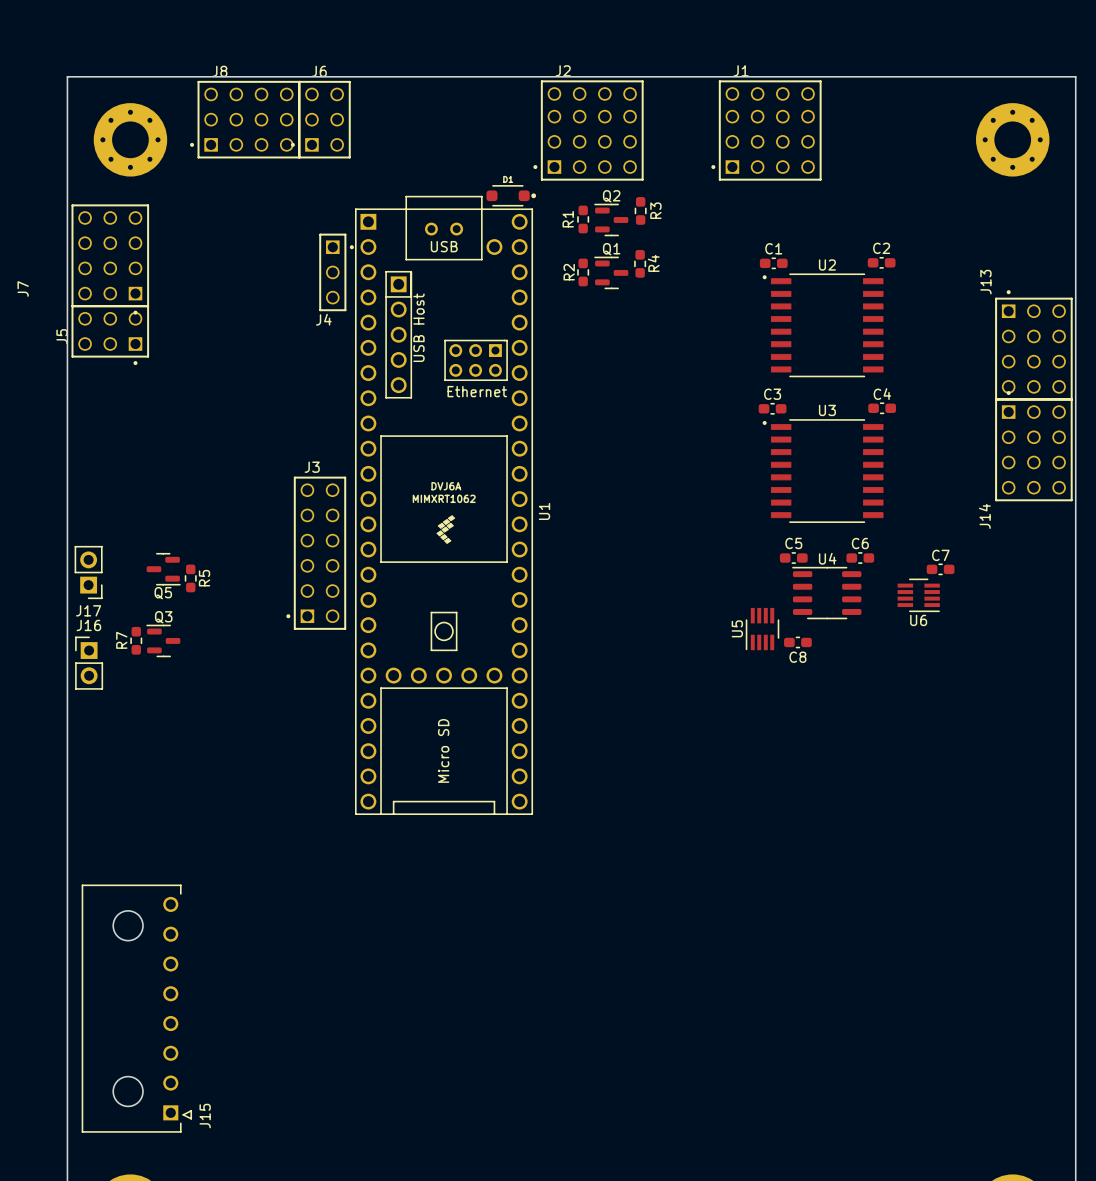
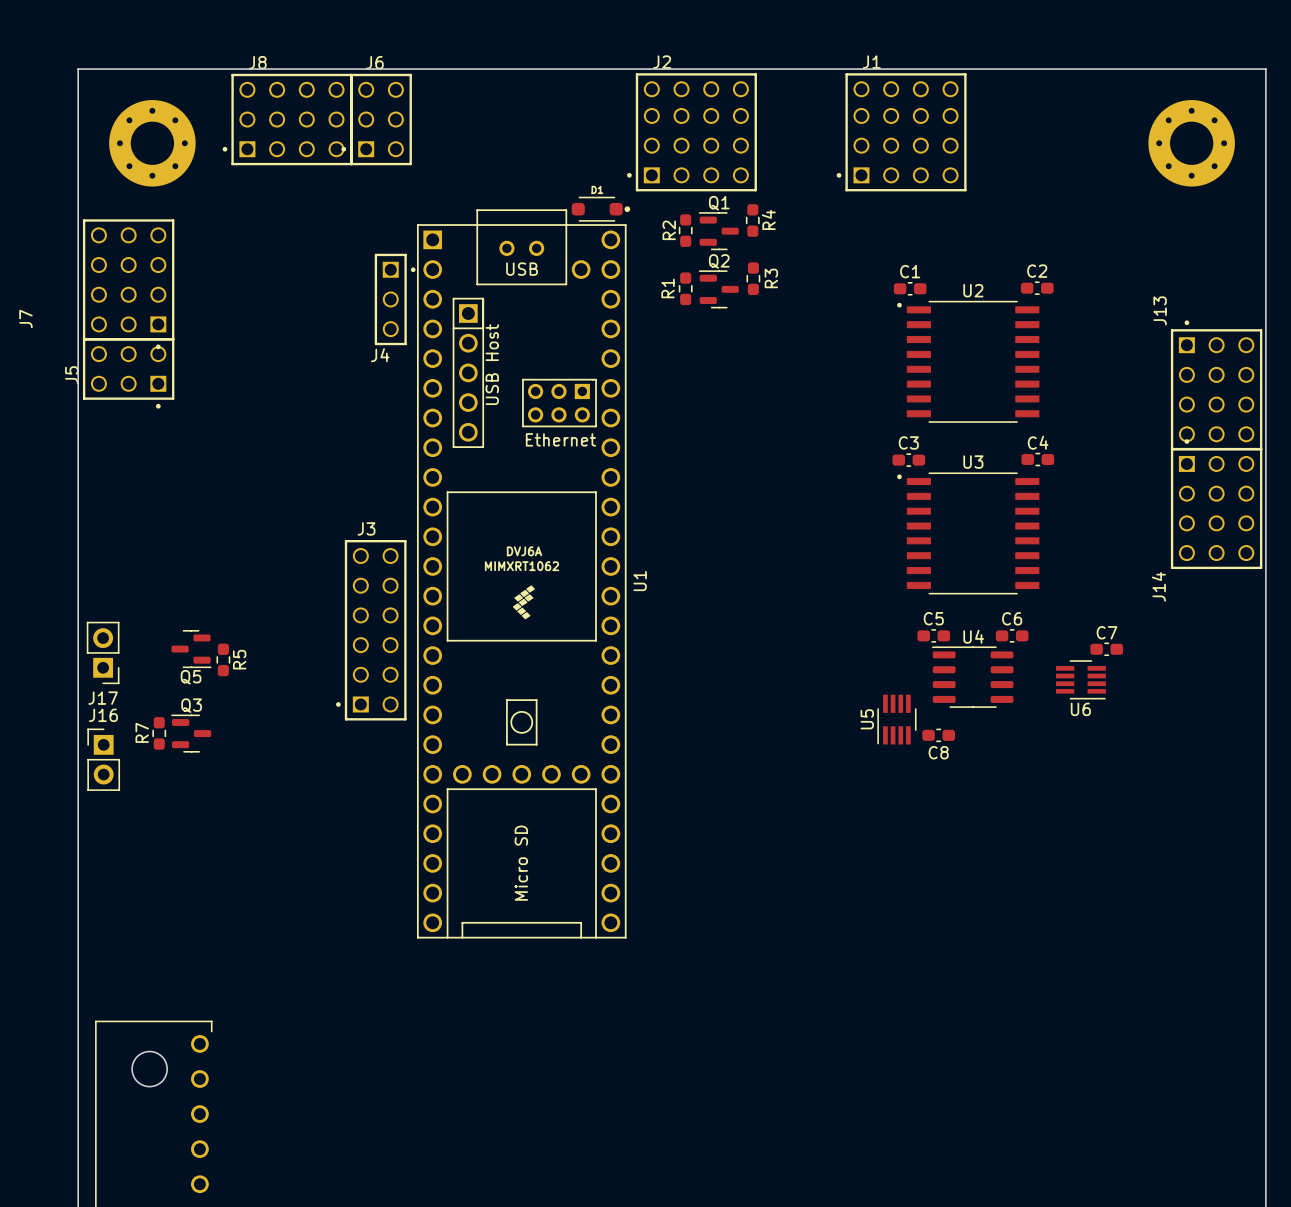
R3 position: (640, 210) -> (753, 278)
R1 position: (583, 219) -> (685, 288)
Q2 position: (611, 219) -> (718, 289)
R4 position: (640, 263) -> (752, 220)
R2 position: (583, 272) -> (685, 230)
Q1 position: (611, 272) -> (718, 231)

